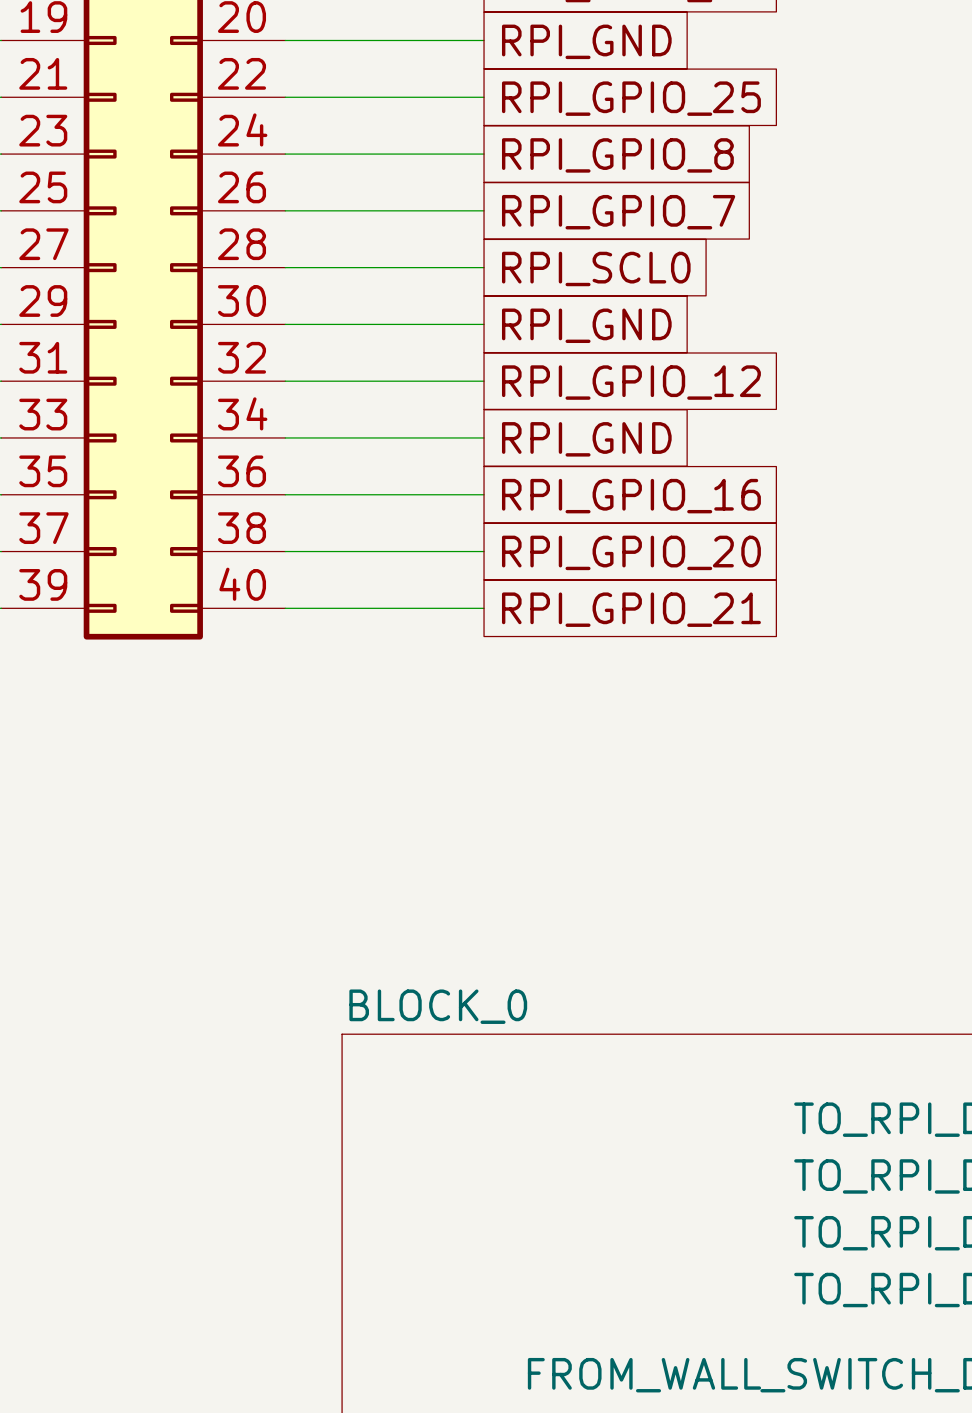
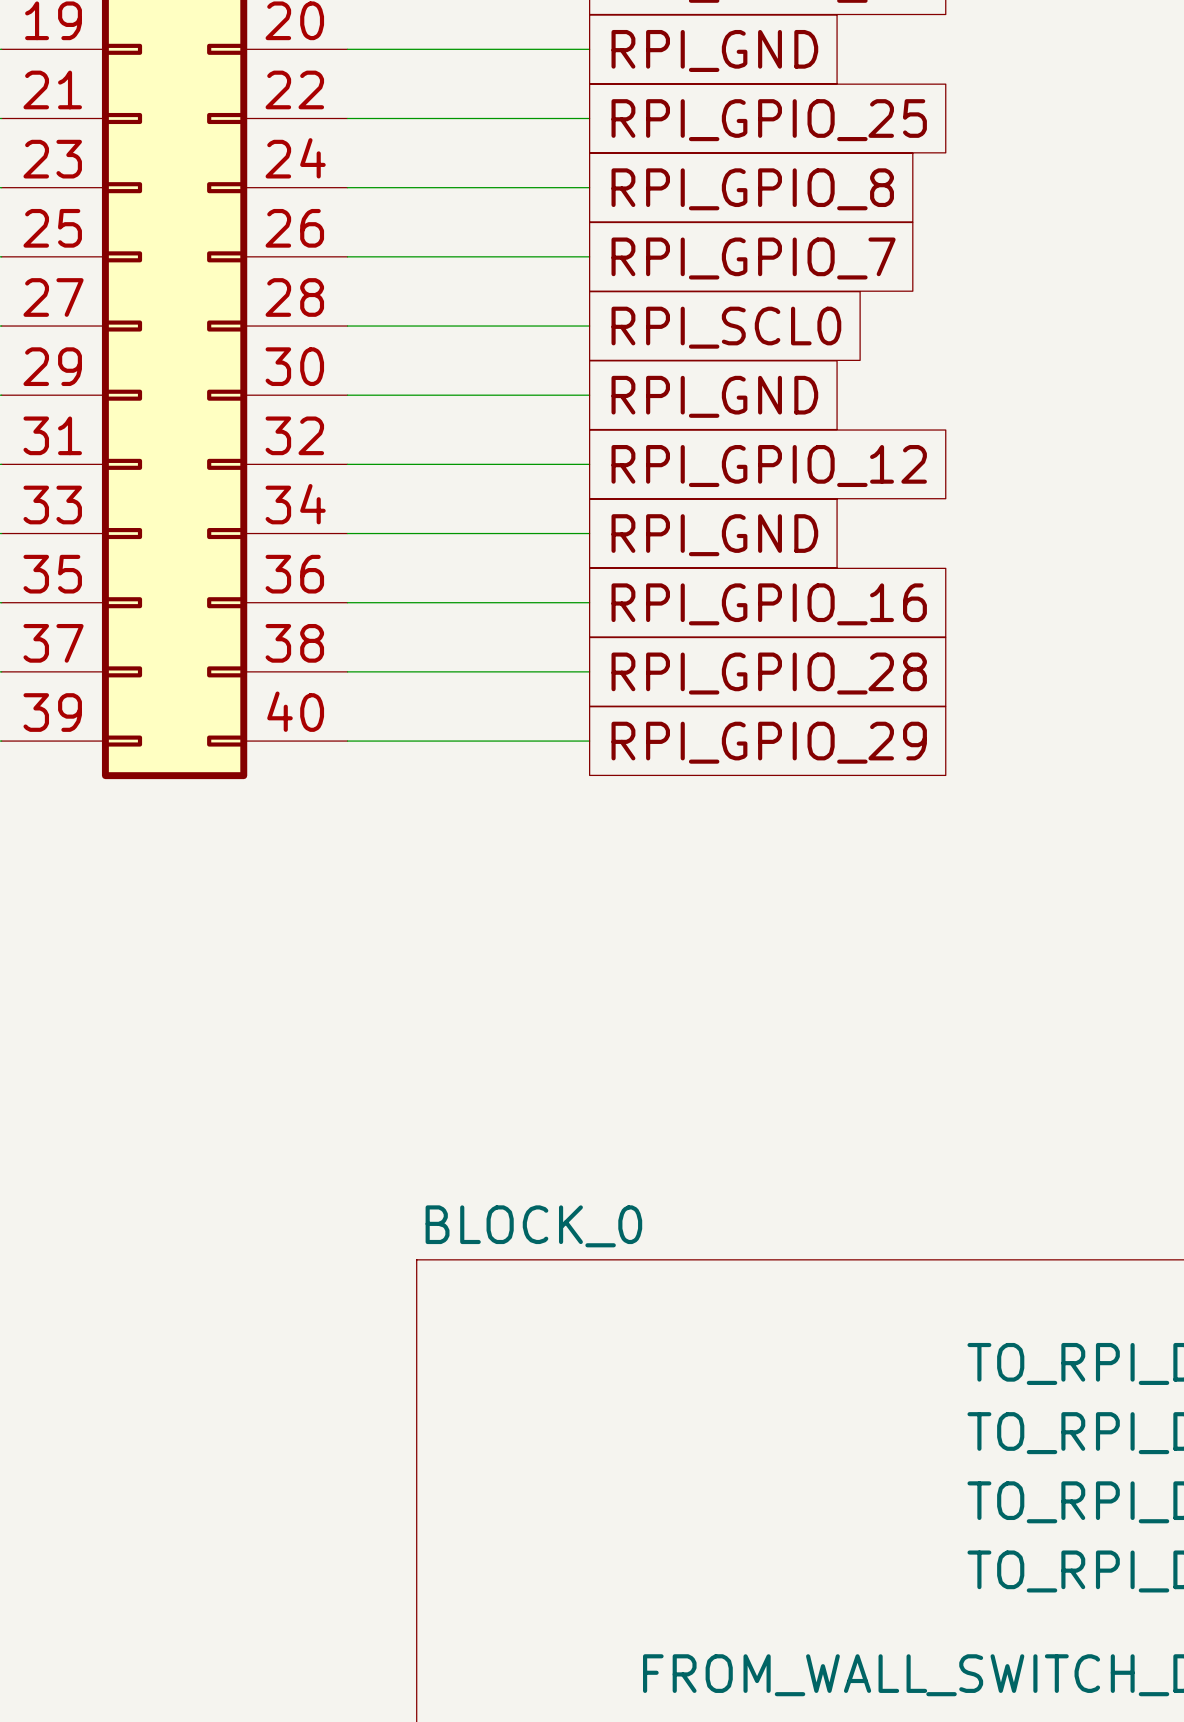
global label: RPI_GPIO_20 (631, 552) -> RPI_GPIO_28 (769, 673)
global label: RPI_GPIO_21 (631, 609) -> RPI_GPIO_29 (769, 742)

